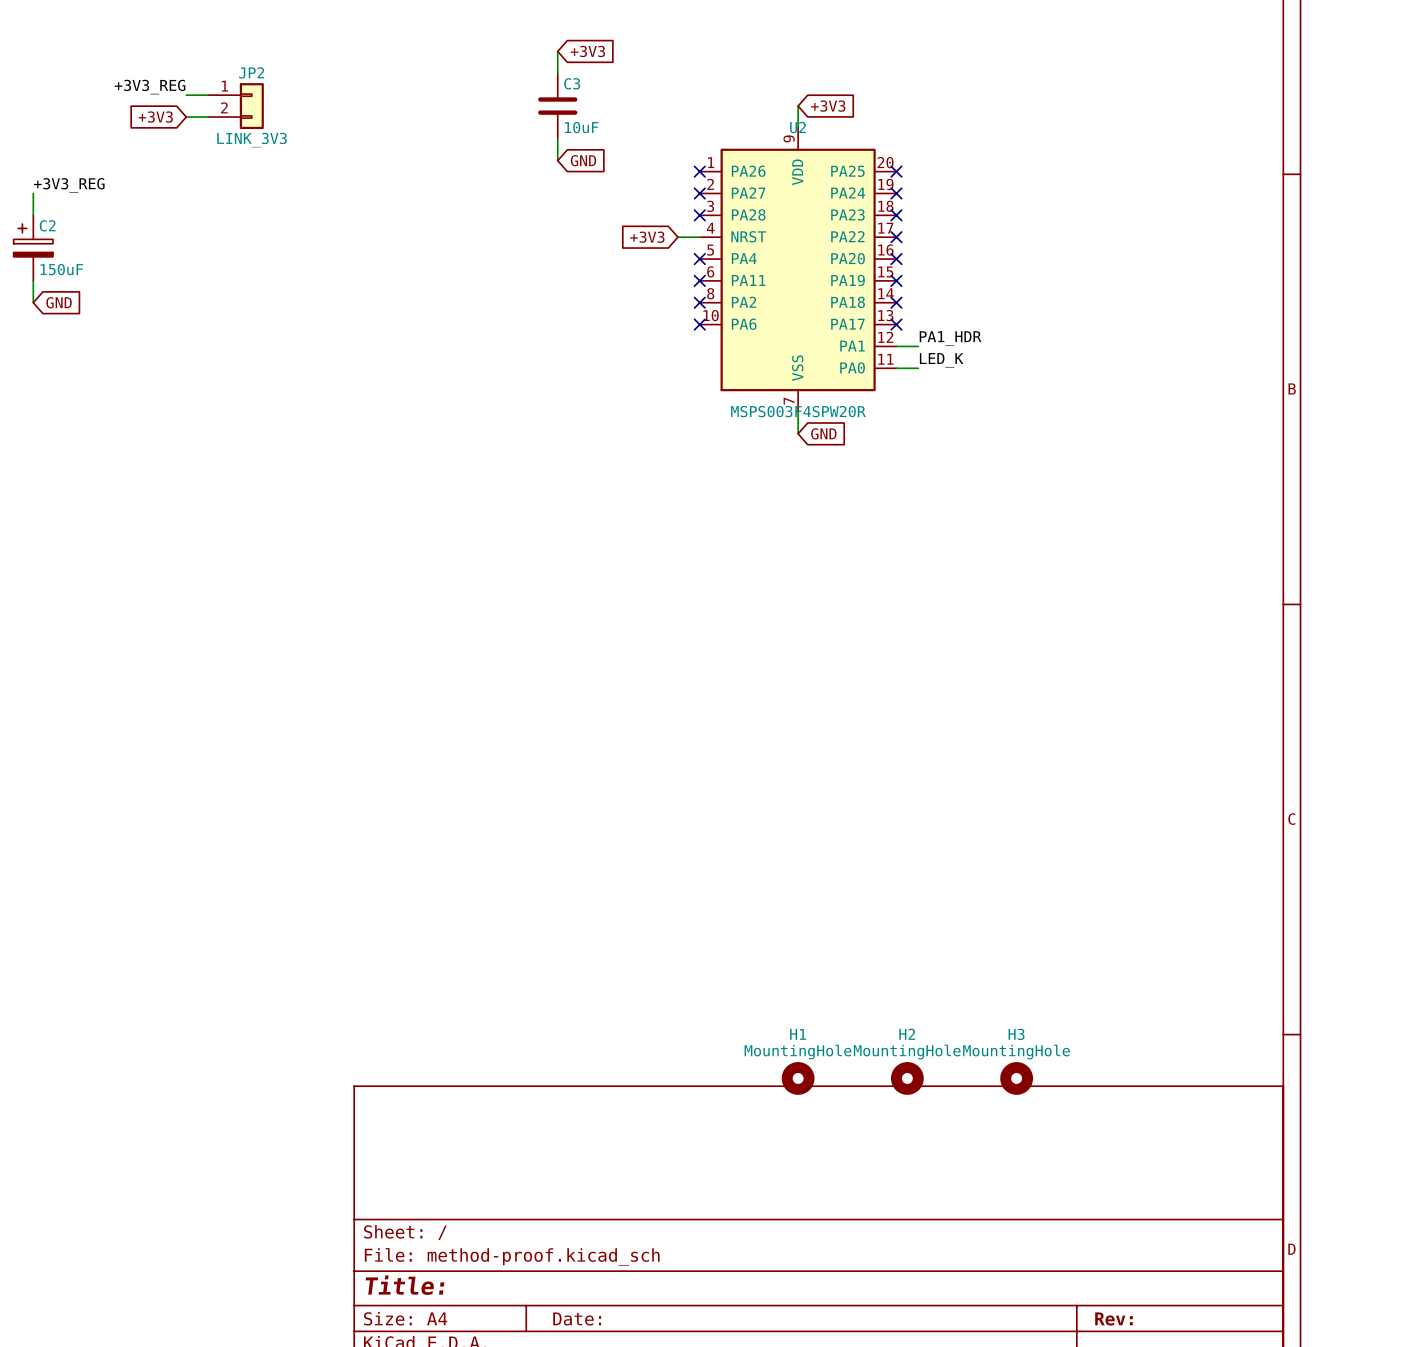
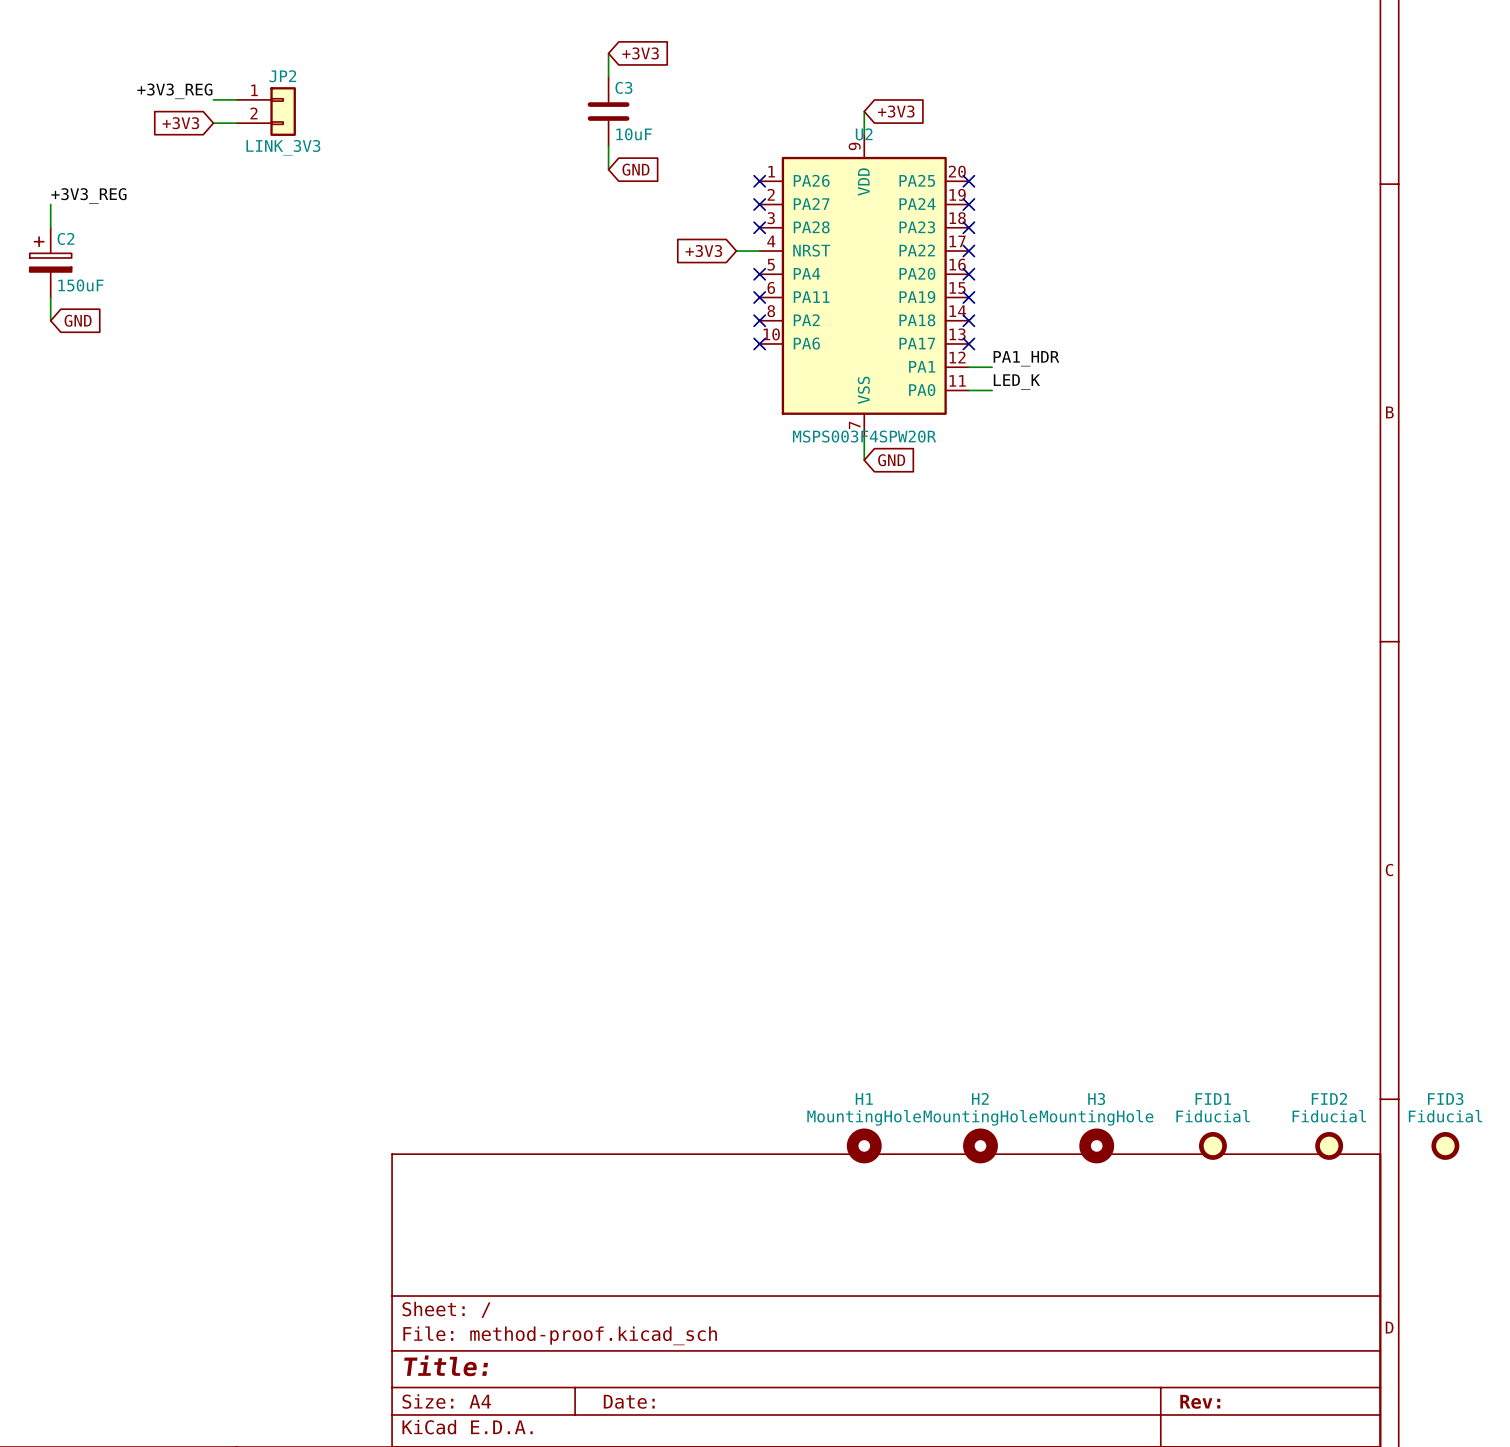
FID1: none -> Fiducial (1212, 1145)
FID2: none -> Fiducial (1329, 1145)
FID3: none -> Fiducial (1445, 1145)

